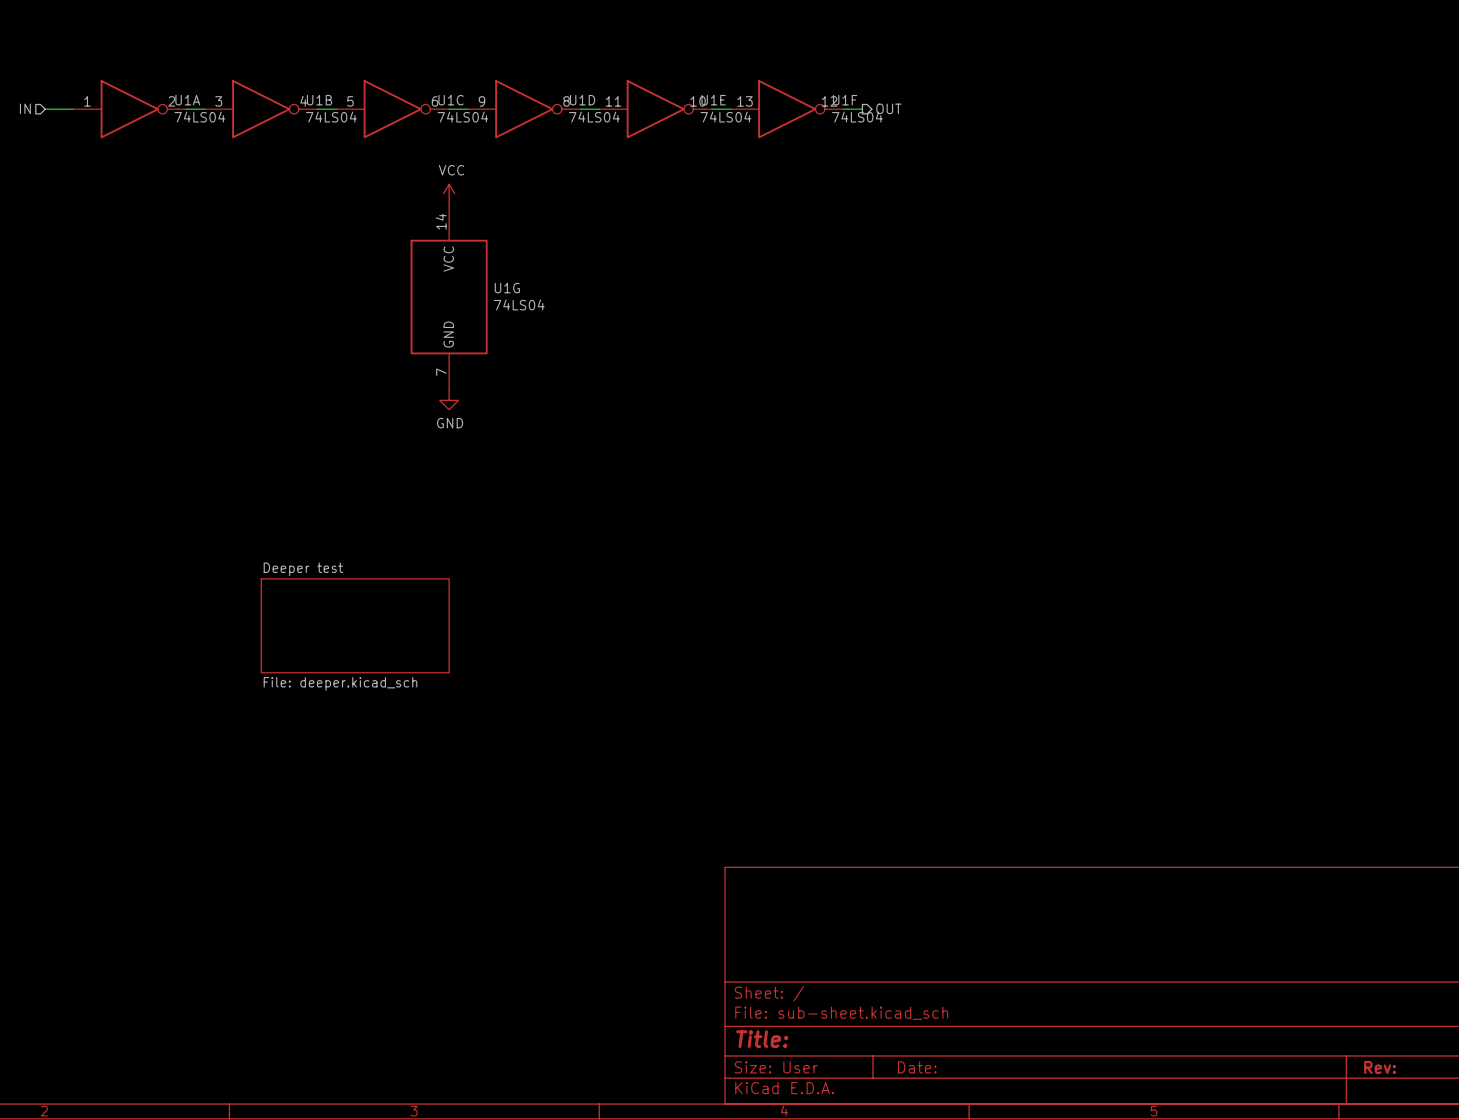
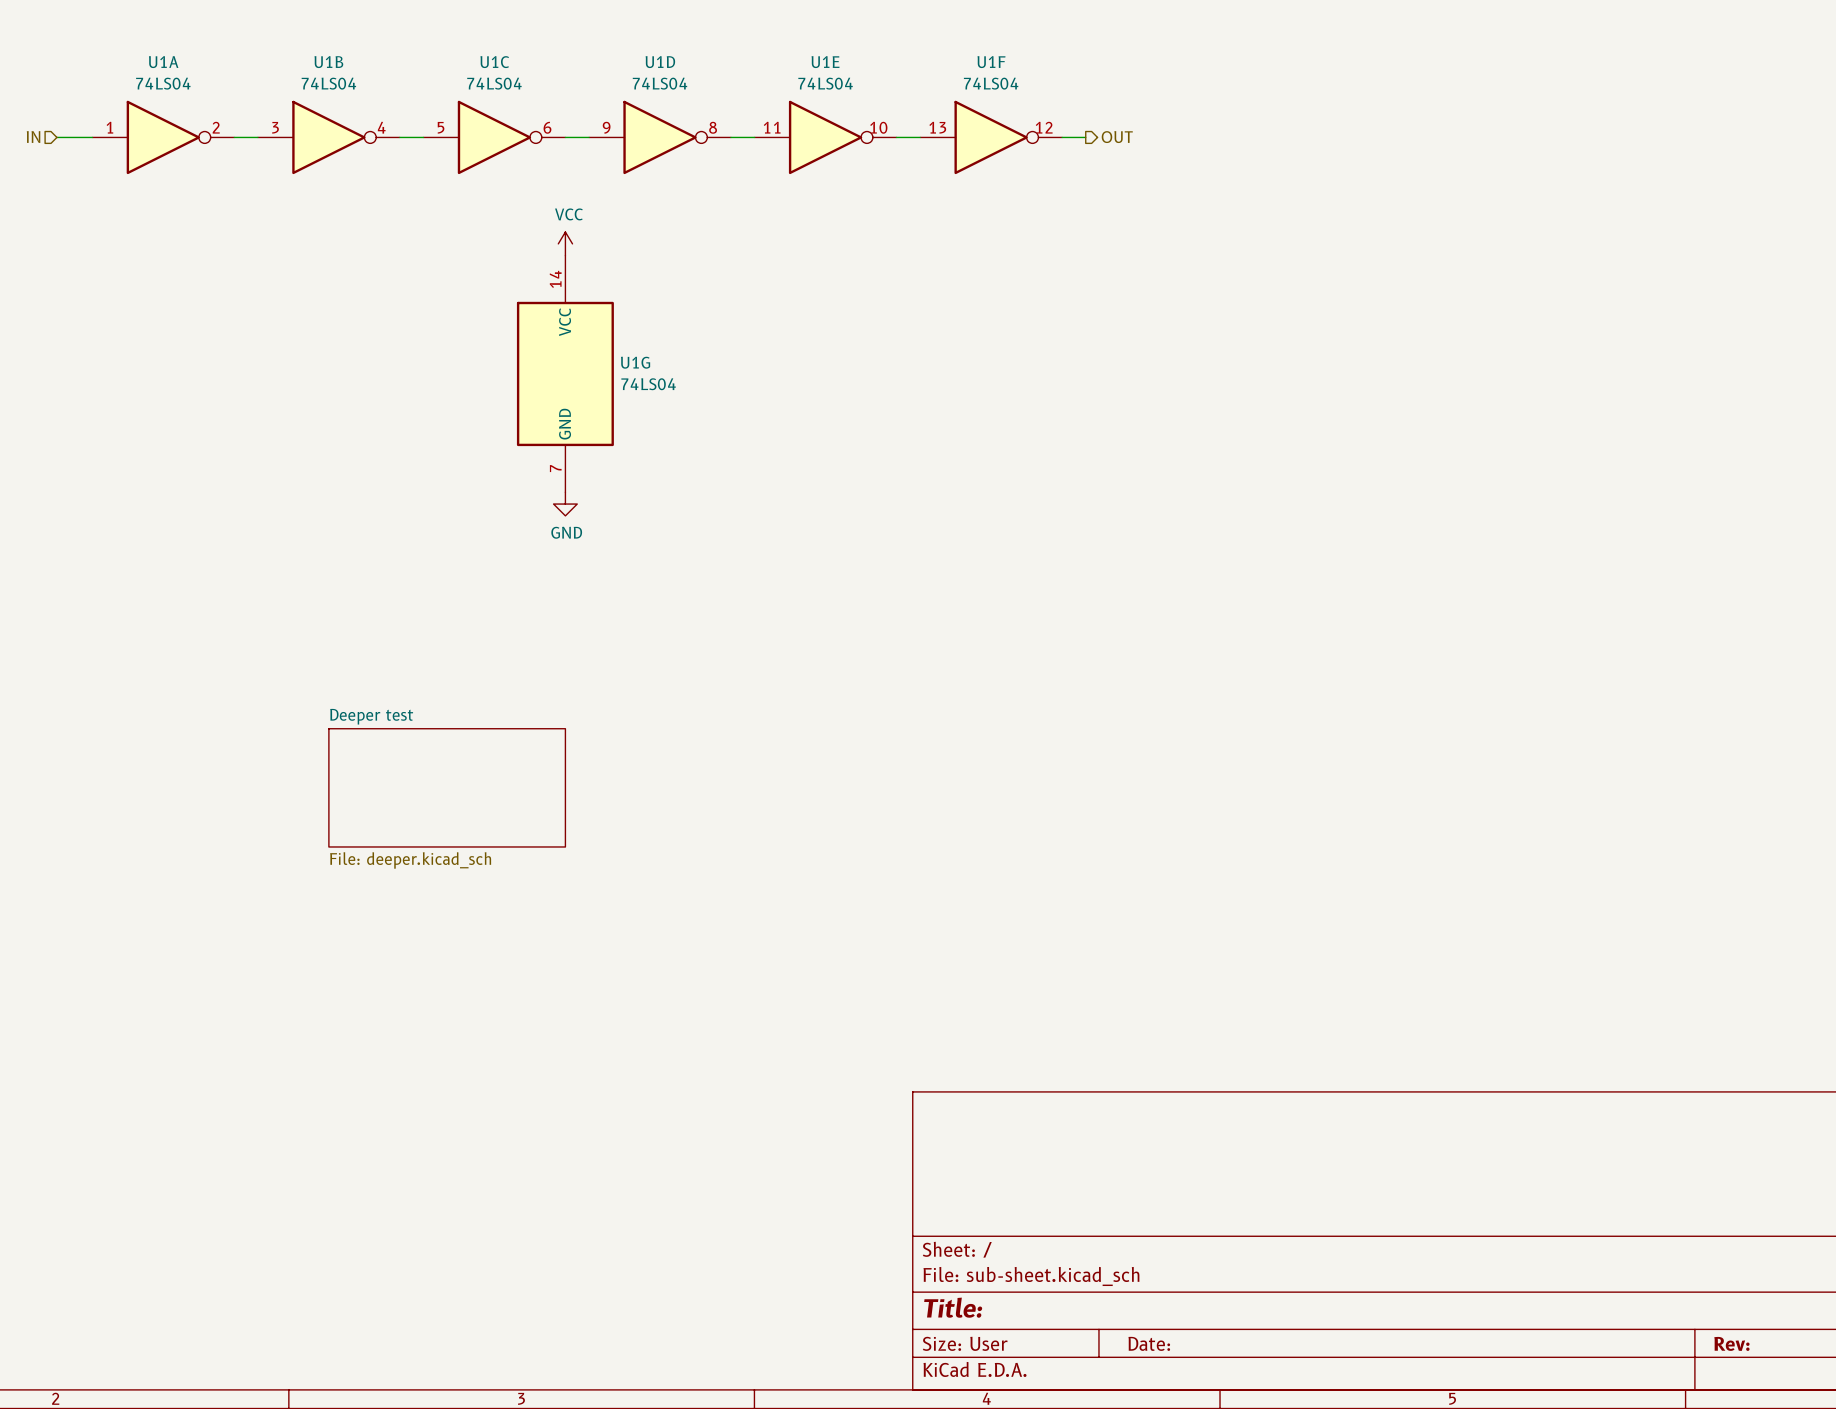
U1A name position: U1A (187, 100) -> U1A (163, 62)
U1B name position: U1B (319, 100) -> U1B (328, 62)
U1C name position: U1C (451, 100) -> U1C (494, 62)
U1D name position: U1D (582, 100) -> U1D (660, 62)
U1E name position: U1E (713, 100) -> U1E (825, 62)
U1F name position: U1F (845, 100) -> U1F (991, 62)
U1A value position: 74LS04 (199, 117) -> 74LS04 (163, 83)
U1B value position: 74LS04 (331, 117) -> 74LS04 (328, 83)
U1C value position: 74LS04 (462, 117) -> 74LS04 (494, 83)
U1D value position: 74LS04 (594, 117) -> 74LS04 (660, 83)
U1E value position: 74LS04 (725, 117) -> 74LS04 (825, 83)
U1F value position: 74LS04 (857, 117) -> 74LS04 (991, 83)

